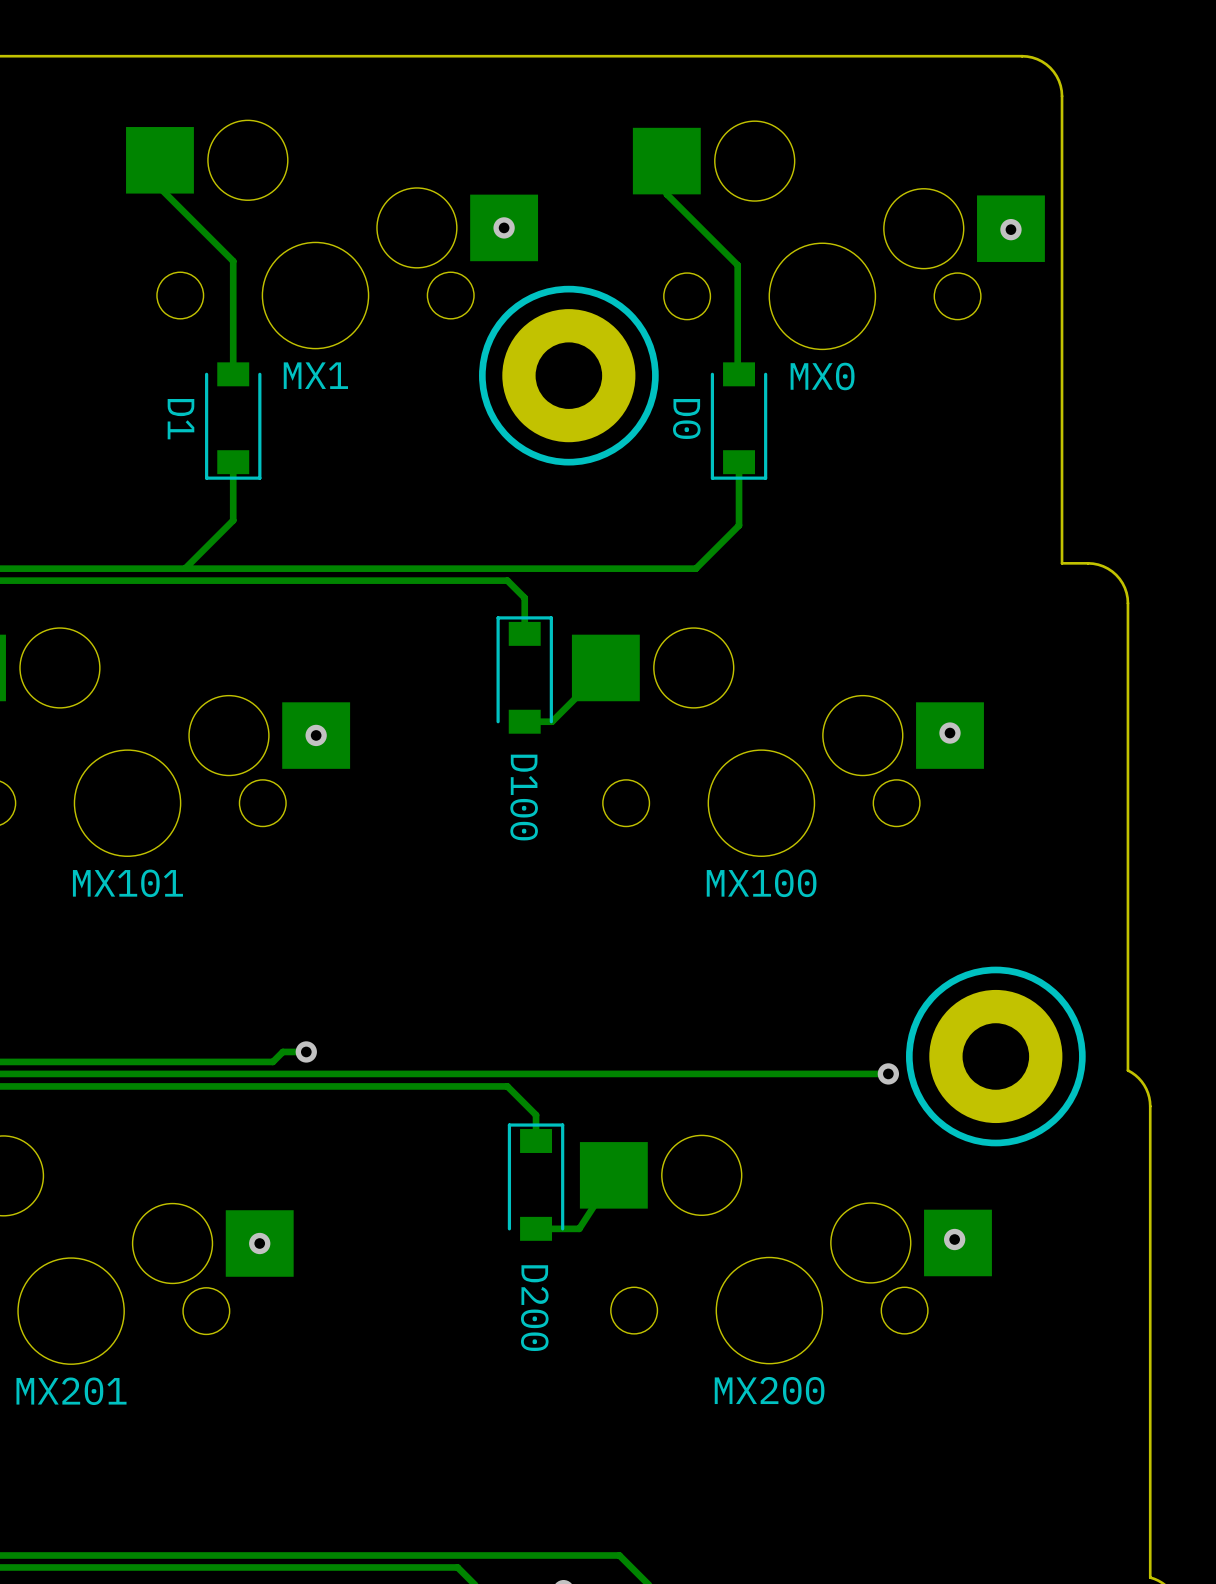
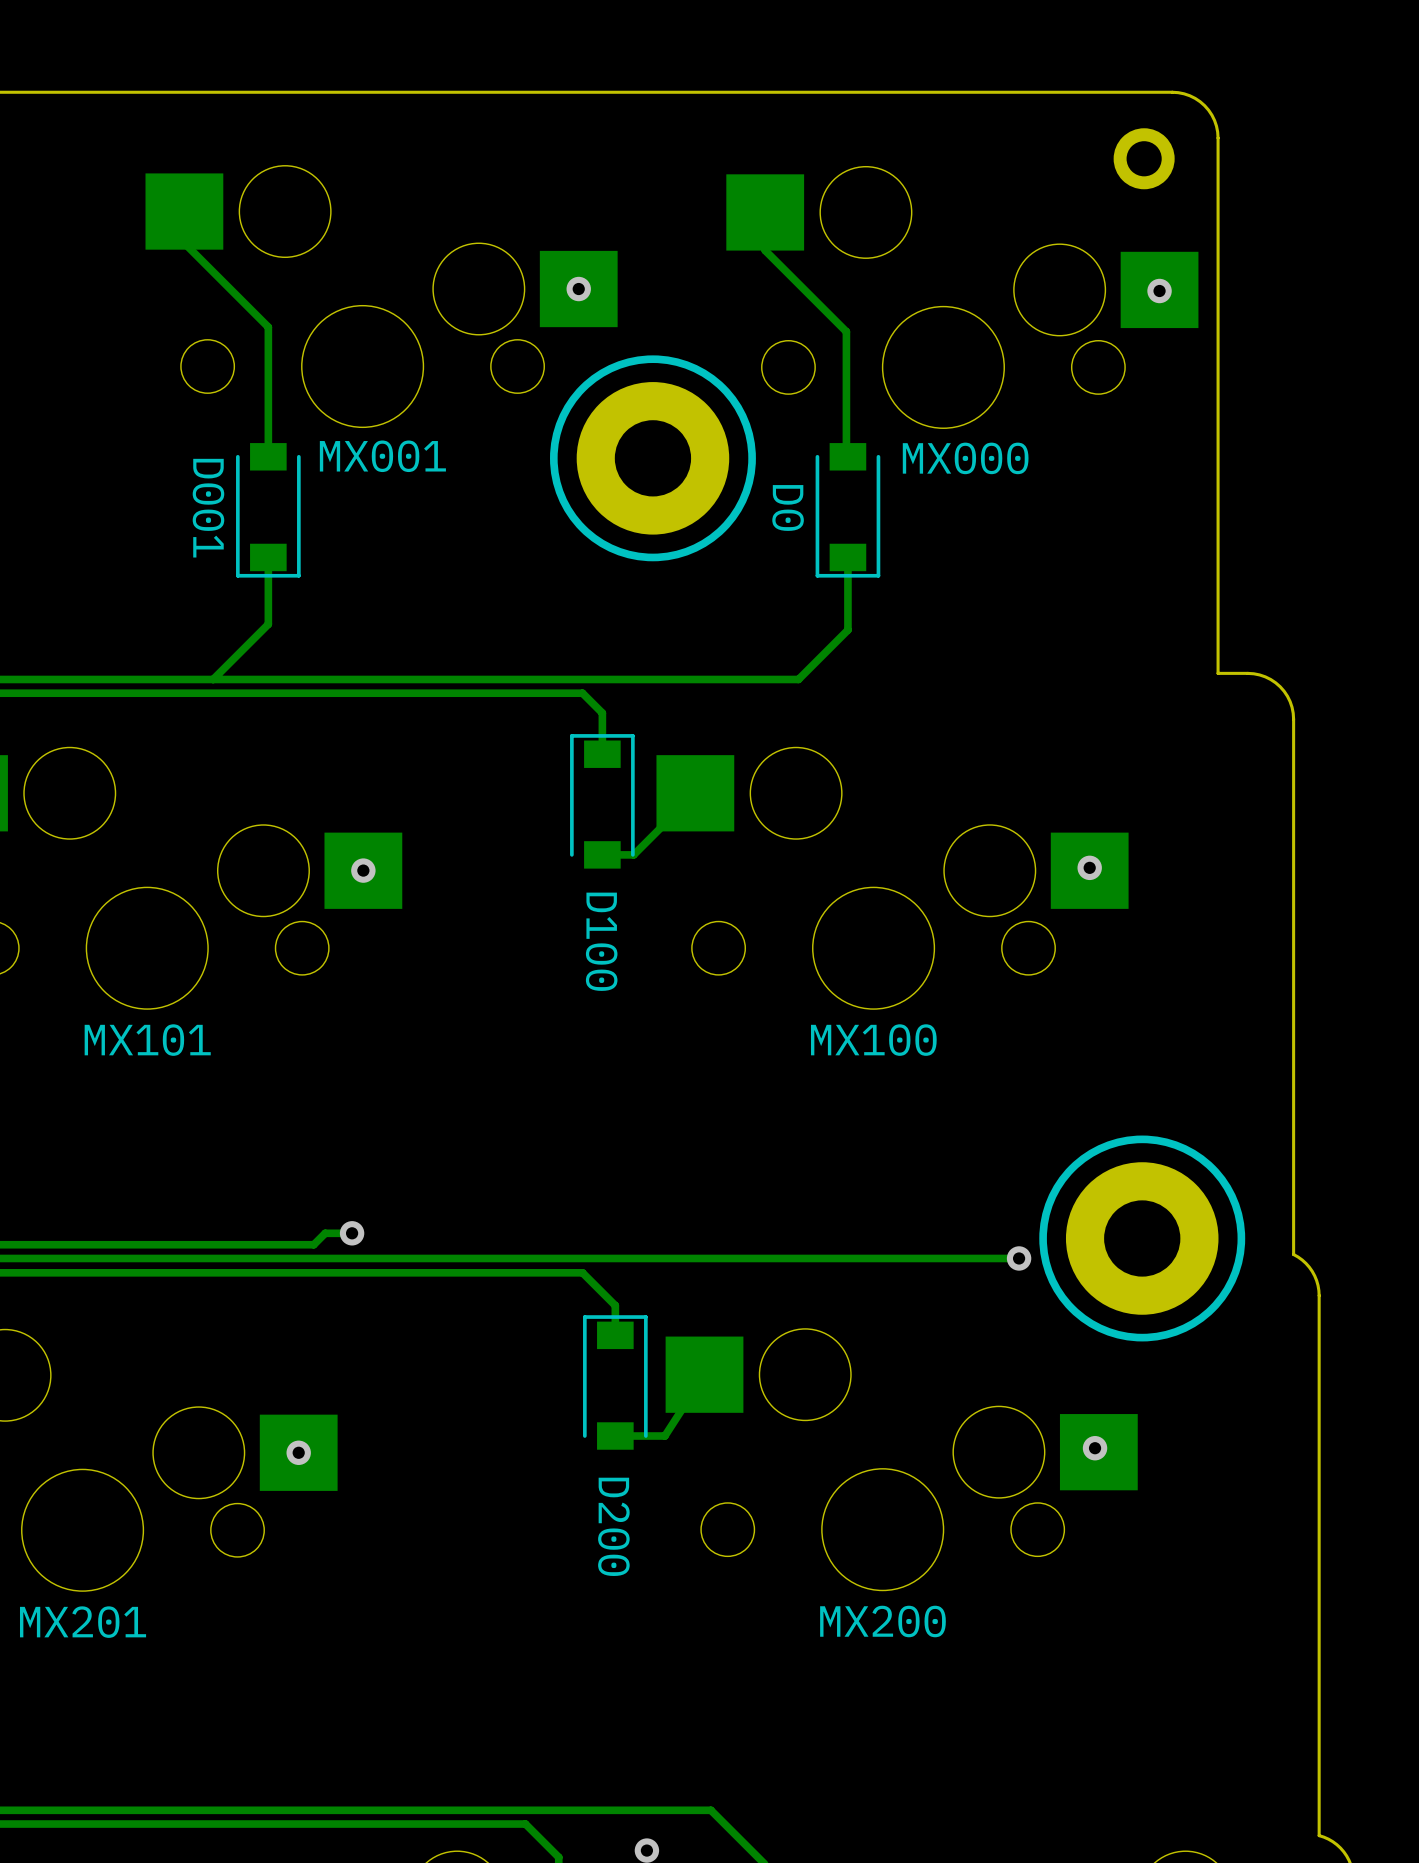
part: none -> (1144, 158)
MX1 name: MX1 (315, 375) -> MX001 (382, 456)
MX0 name: MX0 (822, 376) -> MX000 (965, 458)
D1 name: D1 (180, 419) -> D001 (208, 508)

